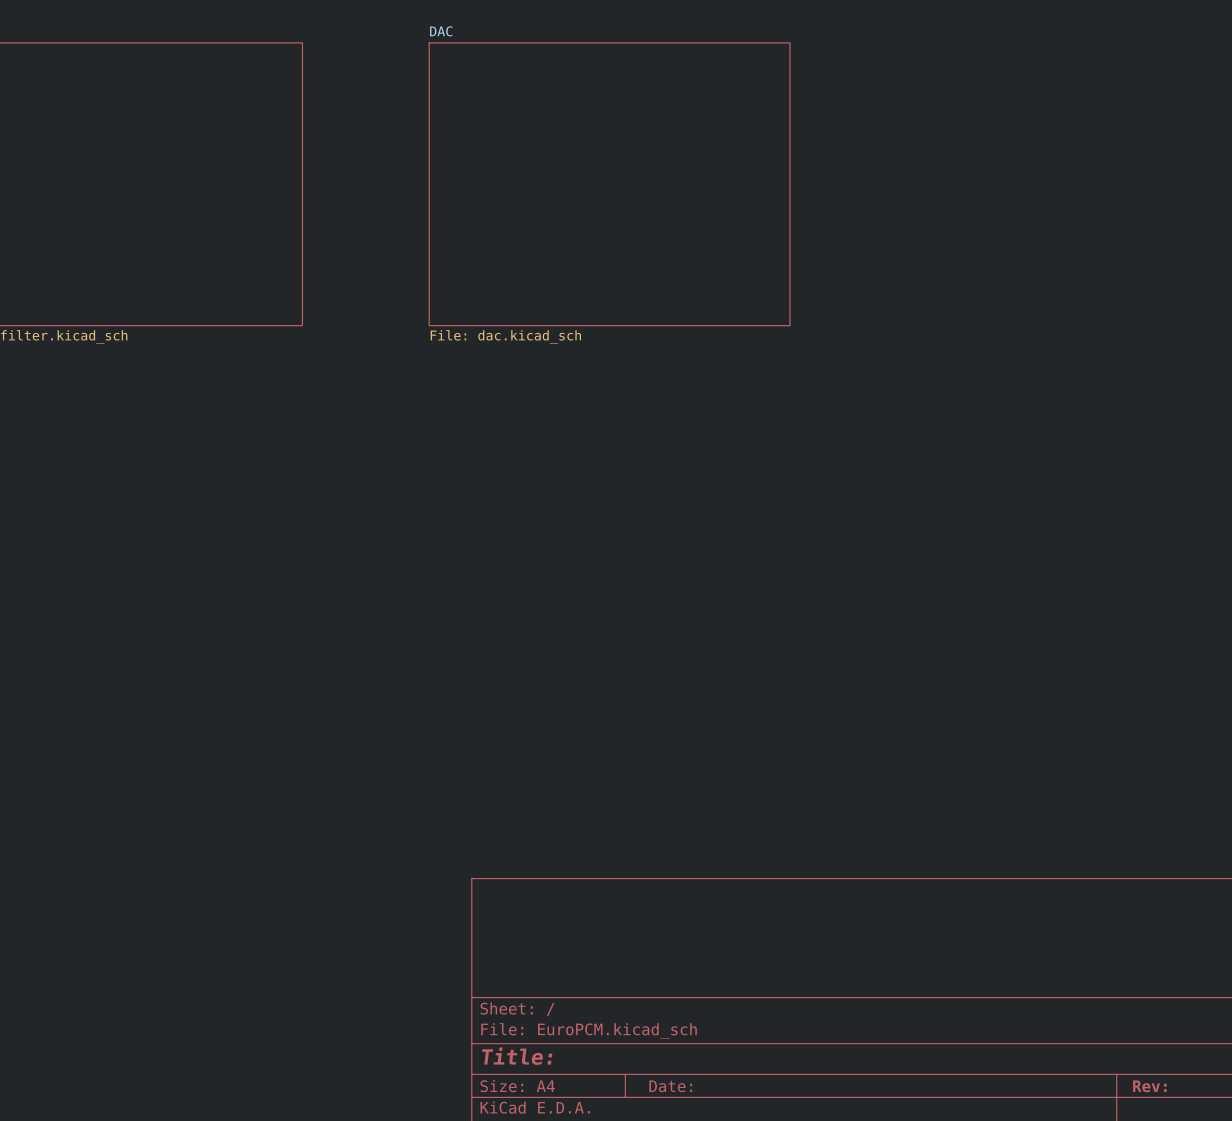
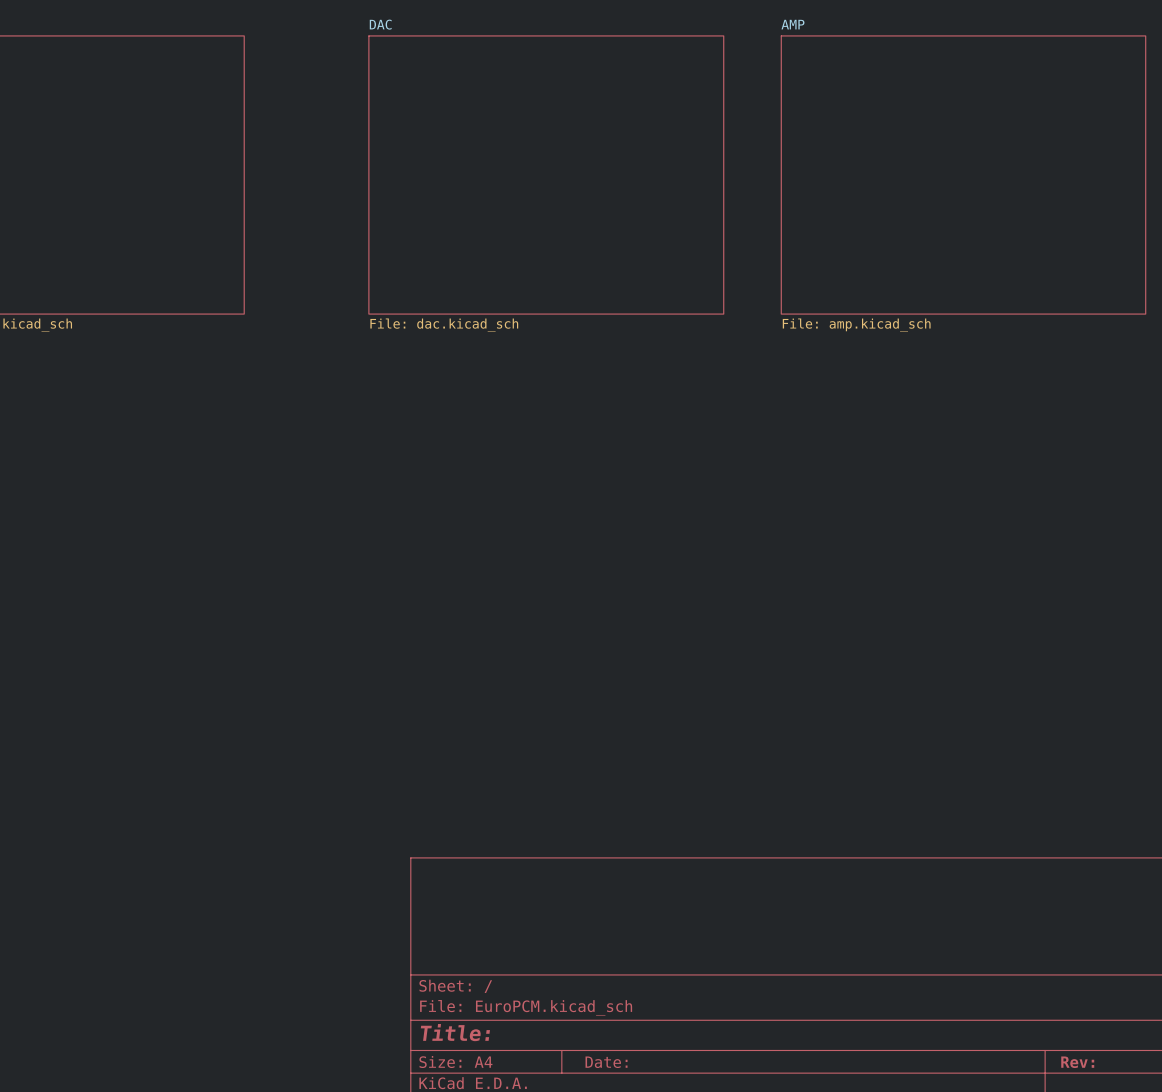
sheet AMP: none -> File: amp.kicad_sch (963, 175)

